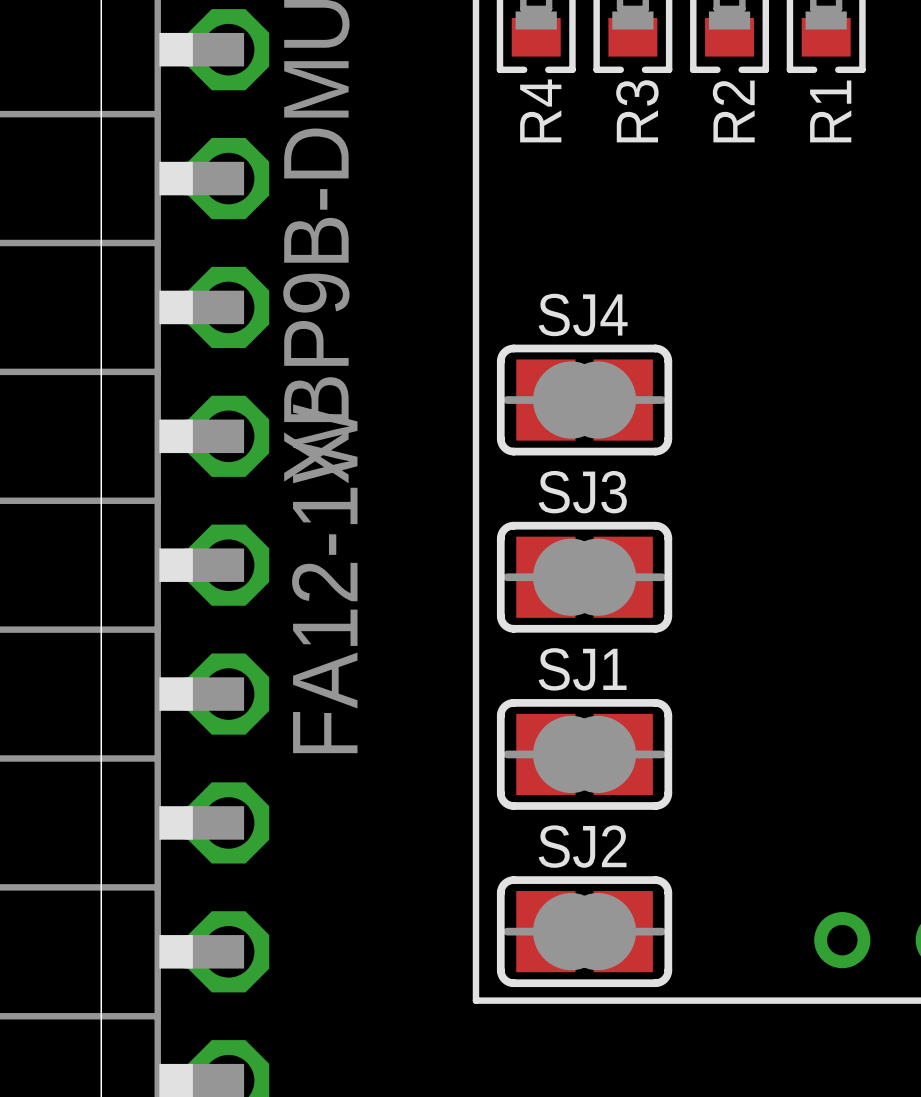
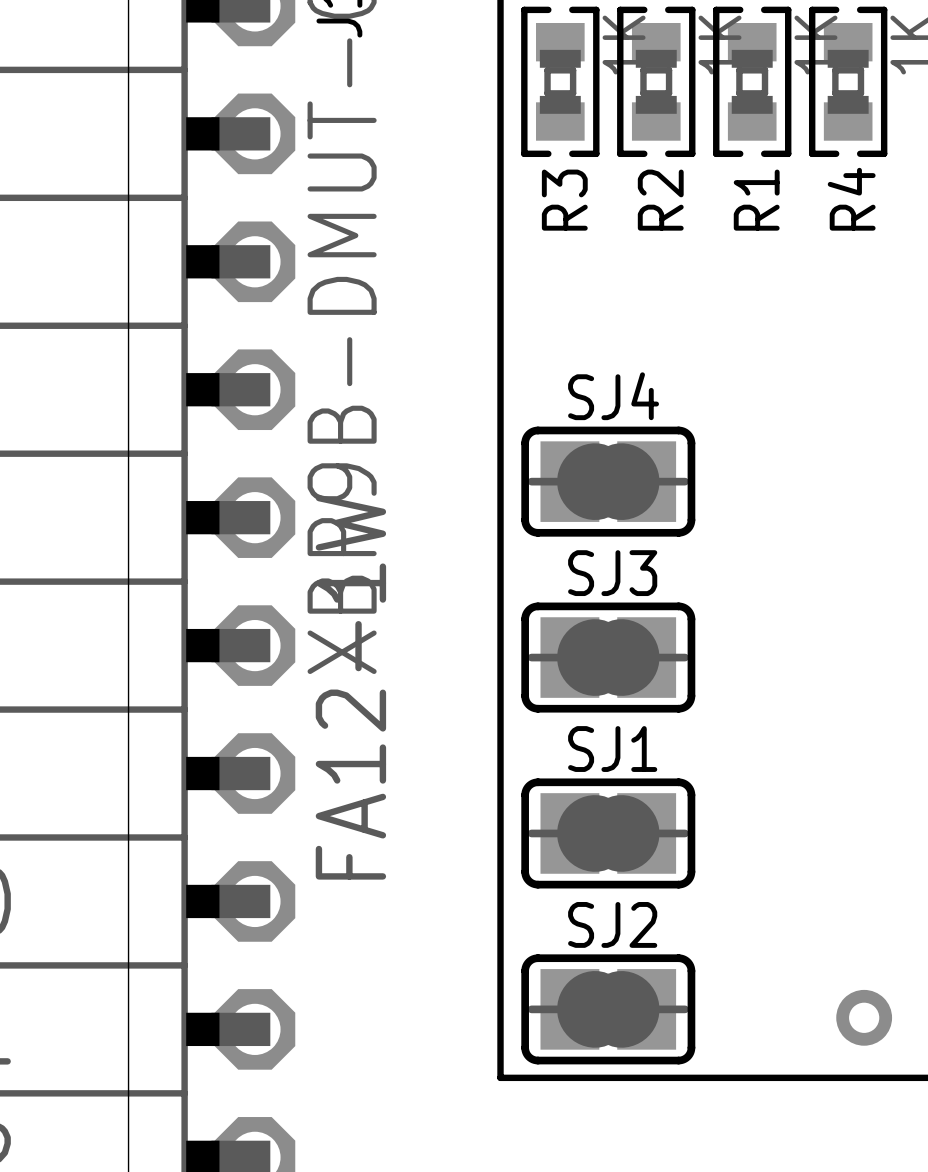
R4 name: R4 (540, 110) -> R3 (564, 200)
R3 name: R3 (637, 111) -> R2 (660, 200)
R2 name: R2 (733, 111) -> R1 (756, 200)
R1 name: R1 (830, 111) -> R4 (851, 199)

